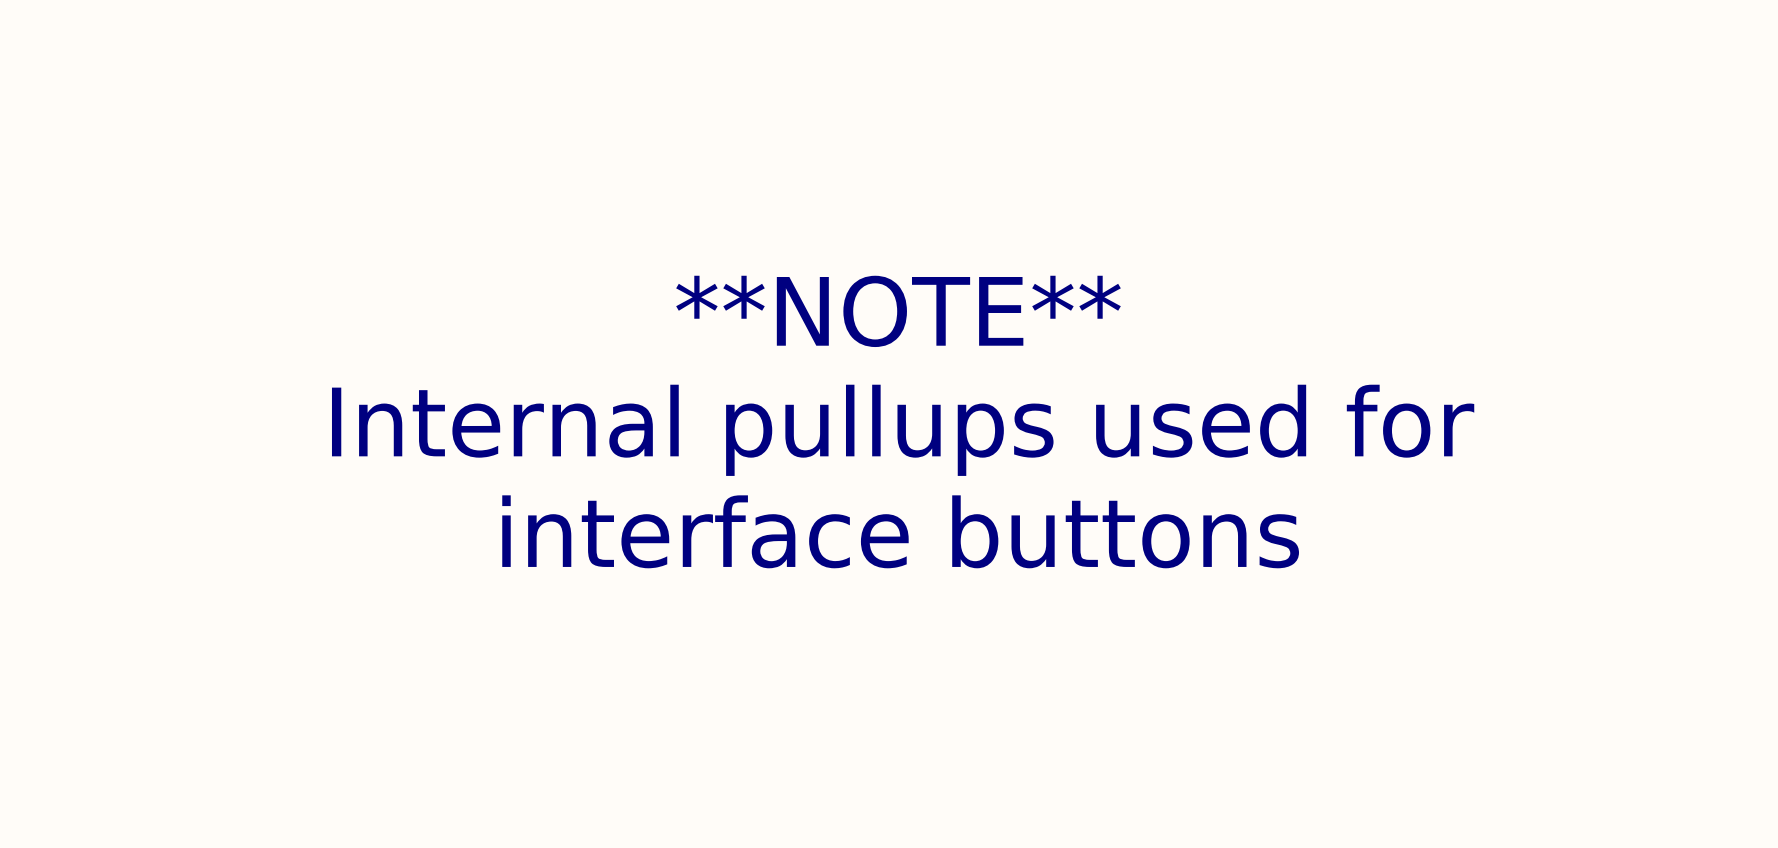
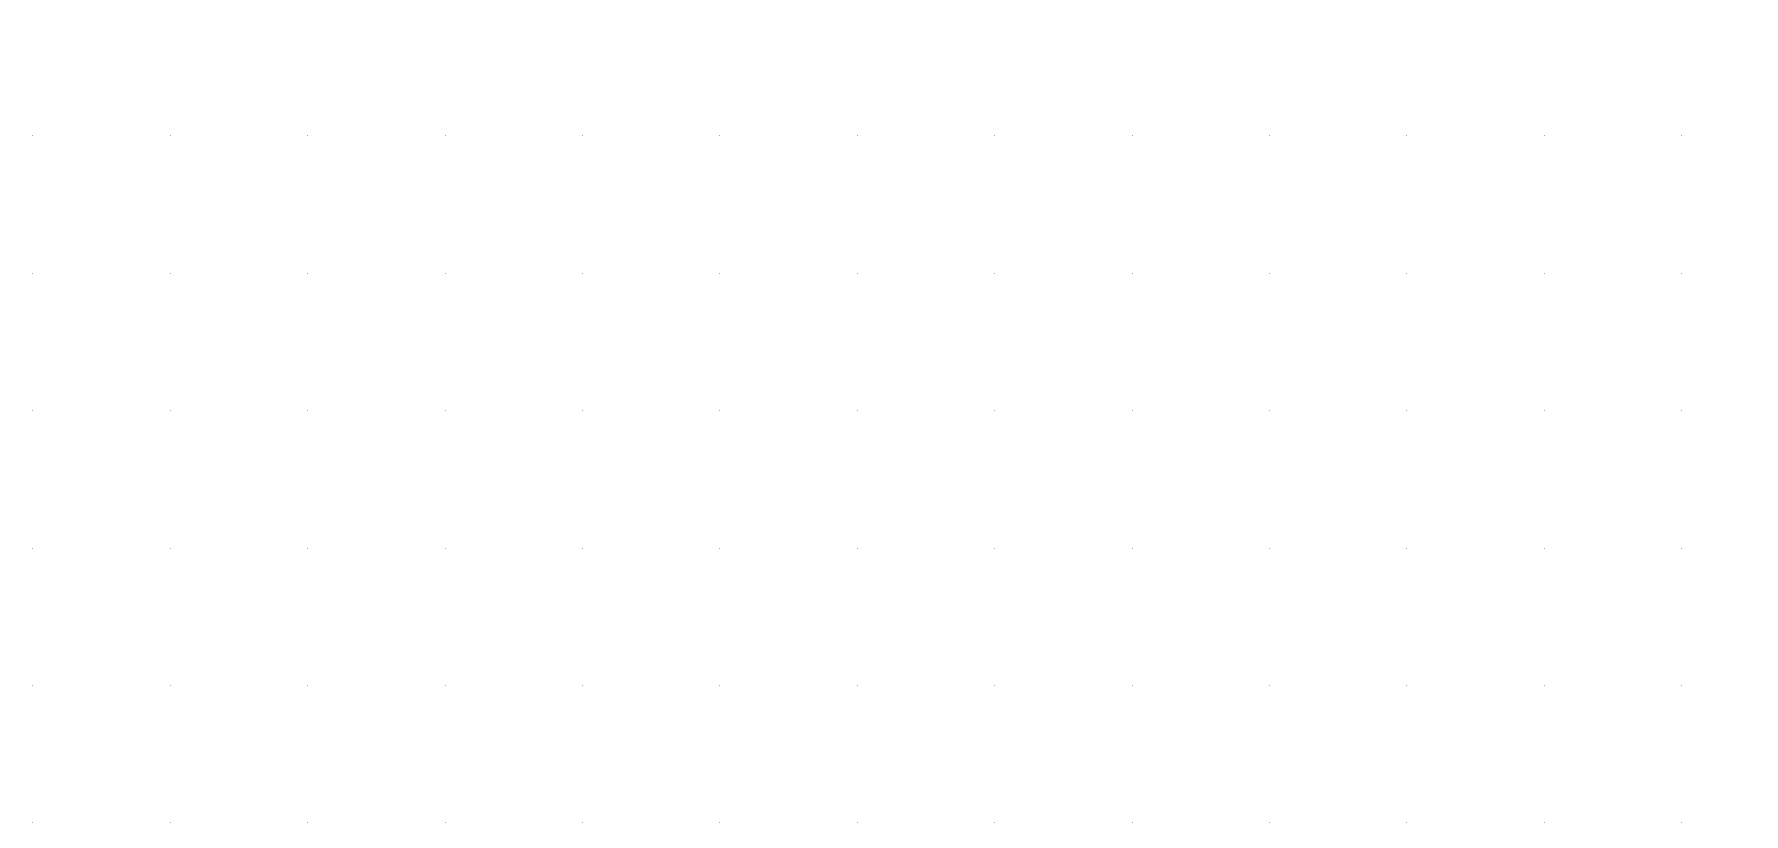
text: **NOTE** (898, 311) -> none
text: Internal pullups used for (903, 430) -> none
text: interface buttons (900, 531) -> none

